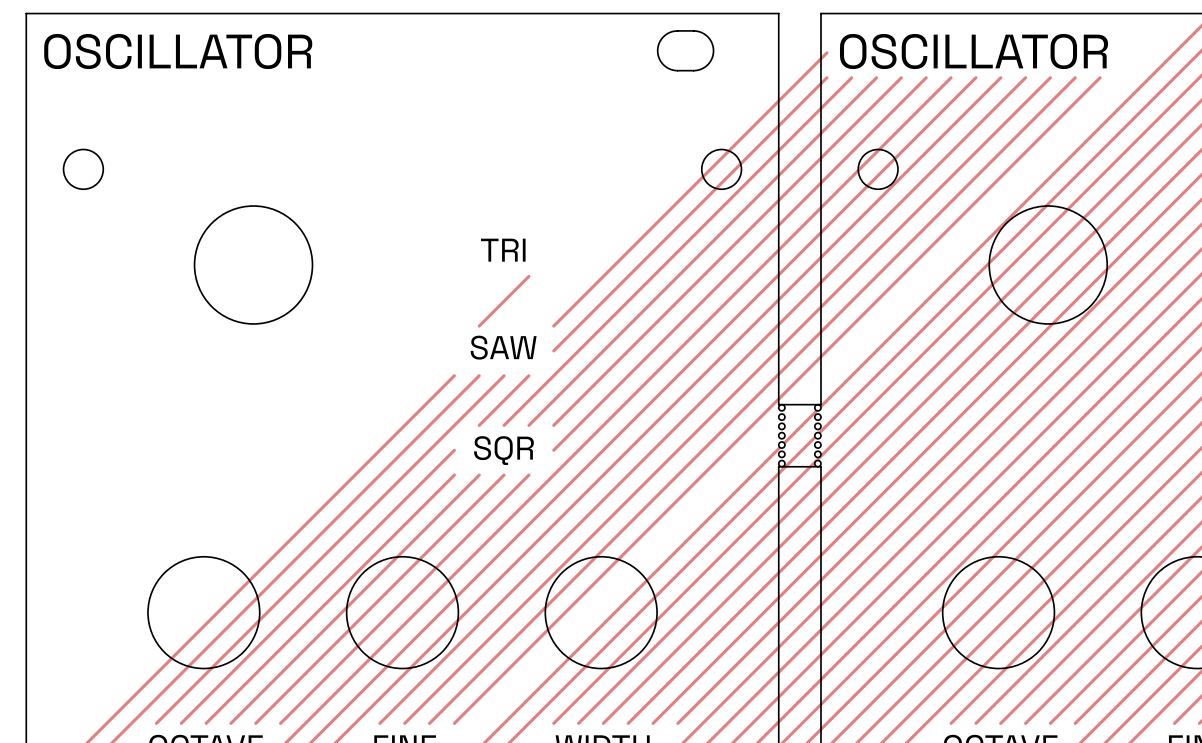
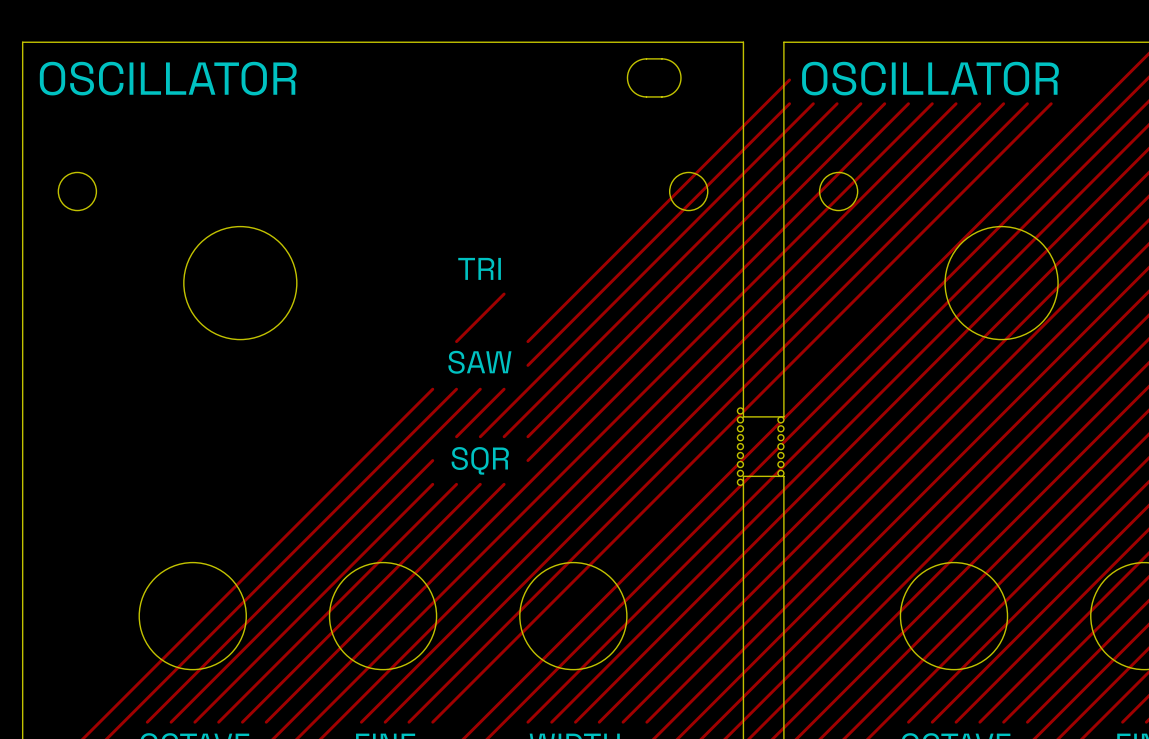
part: none -> (740, 410)
part: none -> (740, 419)
part: (781, 407) -> none
part: none -> (740, 428)
part: (781, 417) -> none
part: none -> (740, 437)
part: (781, 426) -> none
part: none -> (740, 446)
part: (781, 435) -> none
part: none -> (740, 455)
part: (781, 445) -> none
part: none -> (740, 464)
part: (781, 454) -> none
part: none -> (740, 473)
part: (781, 463) -> none
part: none -> (740, 482)

